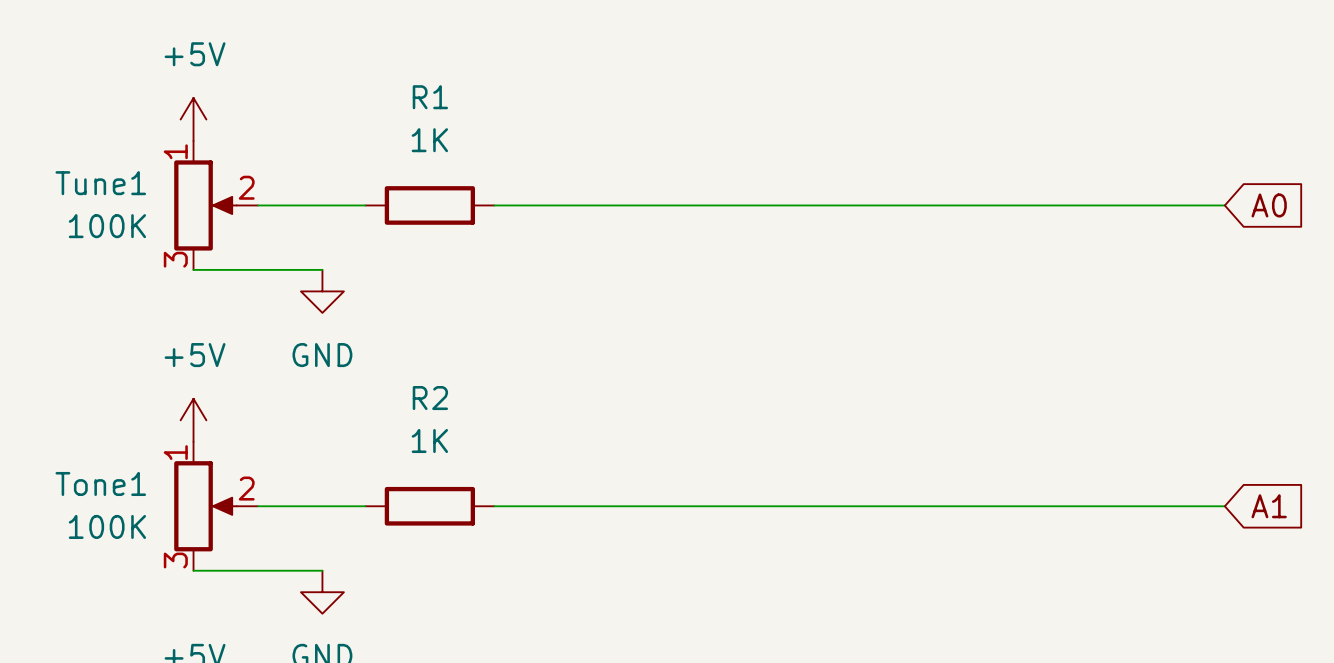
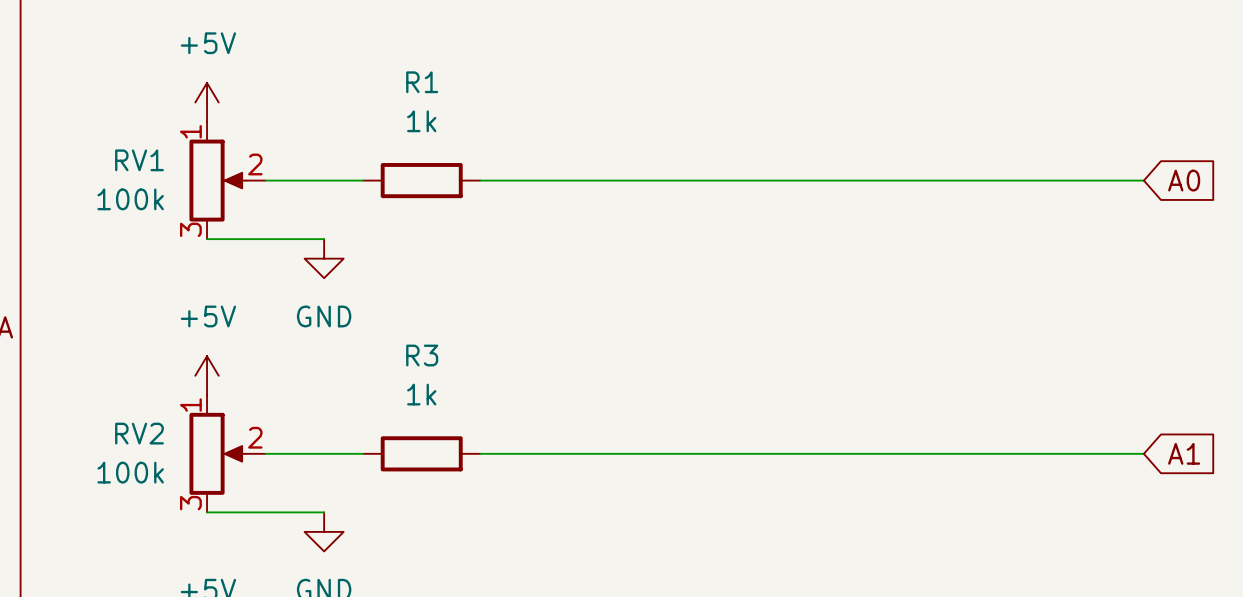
R1 value: 1K (429, 140) -> 1k (421, 121)
Tune1 name: Tune1 (100, 183) -> RV1 (139, 160)
Tune1 value: 100K (107, 226) -> 100k (130, 199)
R2 name: R2 (430, 398) -> R3 (422, 355)
R2 value: 1K (429, 441) -> 1k (421, 394)
Tone1 name: Tone1 (100, 483) -> RV2 (139, 433)
Tone1 value: 100K (107, 526) -> 100k (130, 472)

